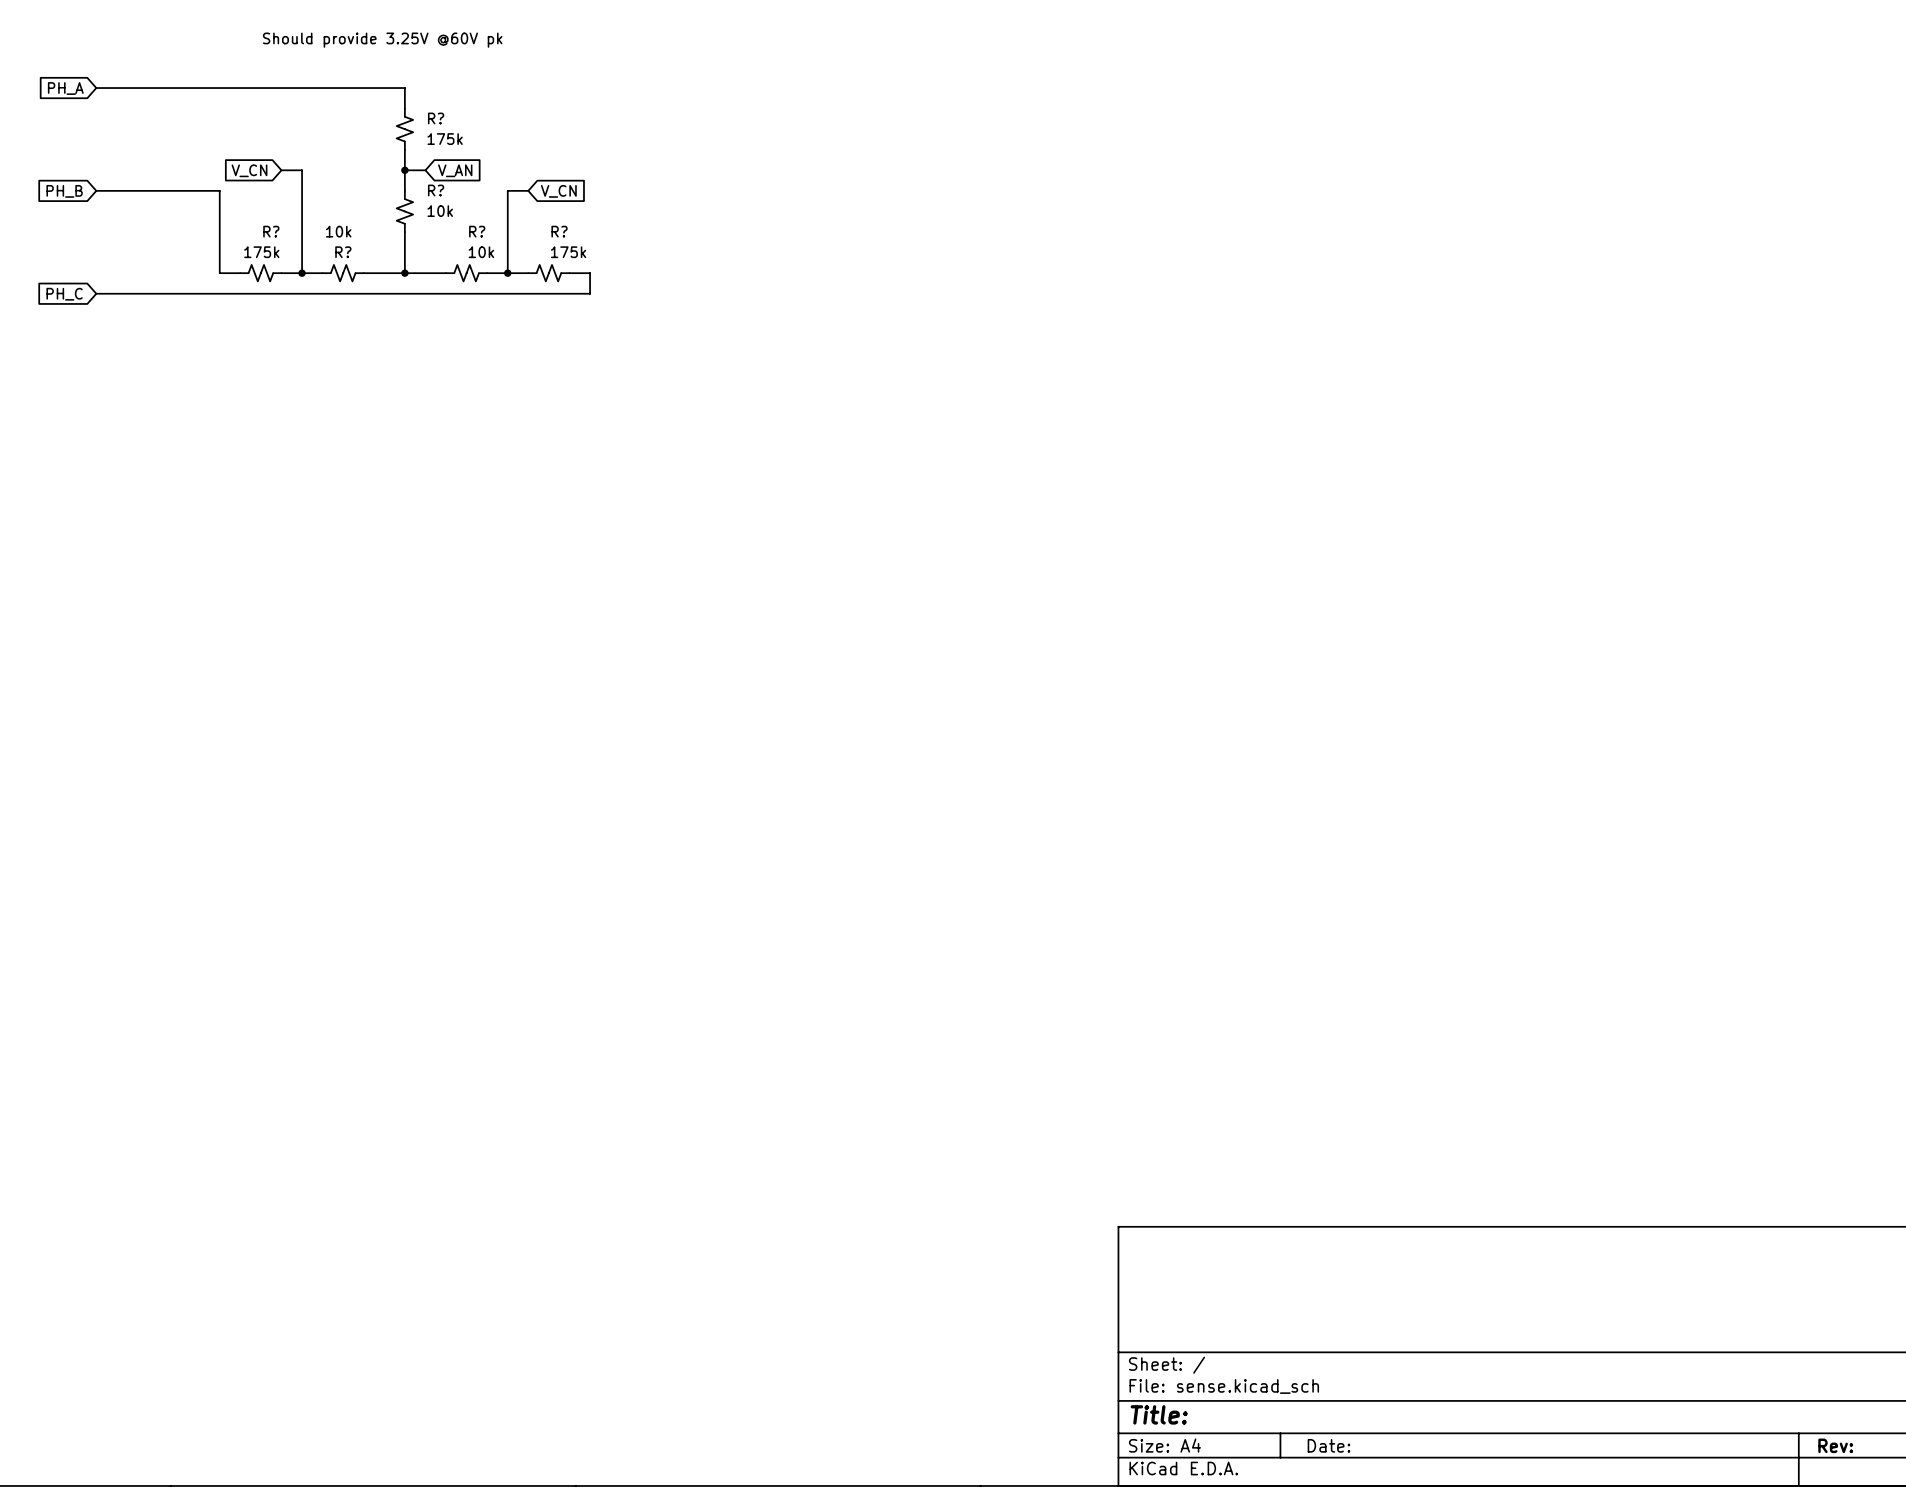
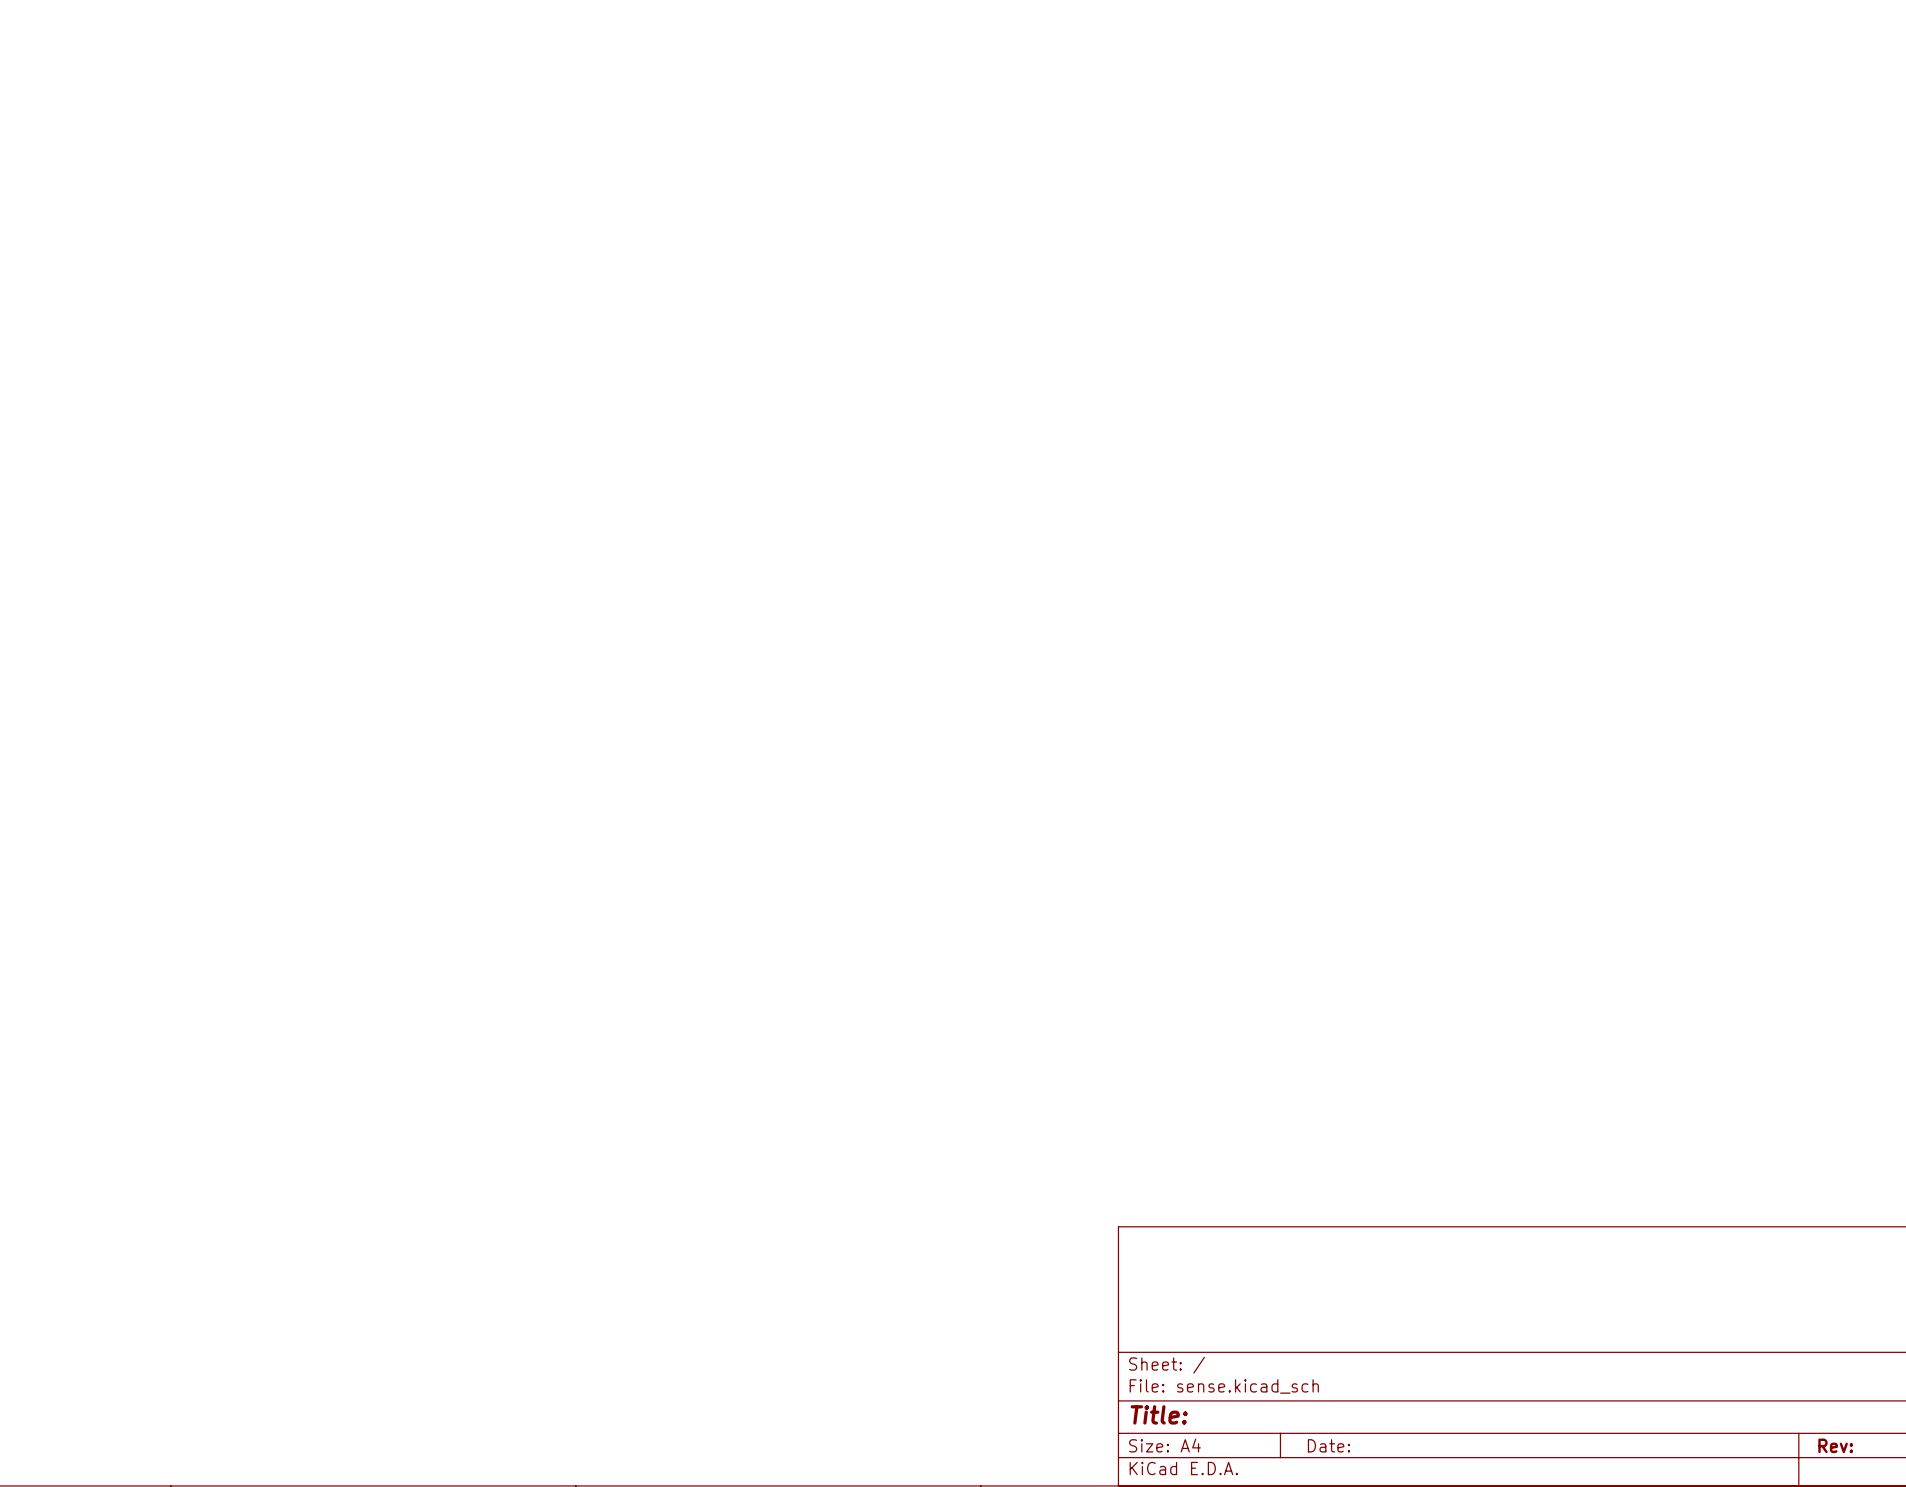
text: Should provide 3.25V @60V pk (382, 40) -> none
global label: PH_A (65, 88) -> none
wire: (96, 88) (404, 88) (404, 108) -> none
R?: 175k (404, 129) -> none
wire: (404, 149) (404, 190) -> none
global label: V_CN (249, 170) -> none
wire: (281, 170) (302, 170) (302, 273) -> none
wire: (404, 170) (425, 170) -> none
junction: (404, 170) -> none
global label: V_AN (455, 170) -> none
wire: (96, 190) (219, 190) (219, 273) (240, 273) -> none
wire: (528, 190) (507, 190) (507, 273) -> none
global label: PH_B (64, 191) -> none
global label: V_CN (558, 191) -> none
R?: 10k (404, 211) -> none
wire: (404, 232) (404, 273) -> none
R?: 175k (260, 273) -> none
wire: (281, 273) (322, 273) -> none
junction: (302, 273) -> none
R?: 10k (343, 273) -> none
wire: (363, 273) (446, 273) -> none
junction: (404, 273) -> none
R?: 10k (466, 273) -> none
wire: (487, 273) (528, 273) -> none
junction: (507, 273) -> none
R?: 175k (548, 273) -> none
wire: (569, 273) (590, 273) (590, 293) (96, 293) -> none
global label: PH_C (64, 294) -> none

